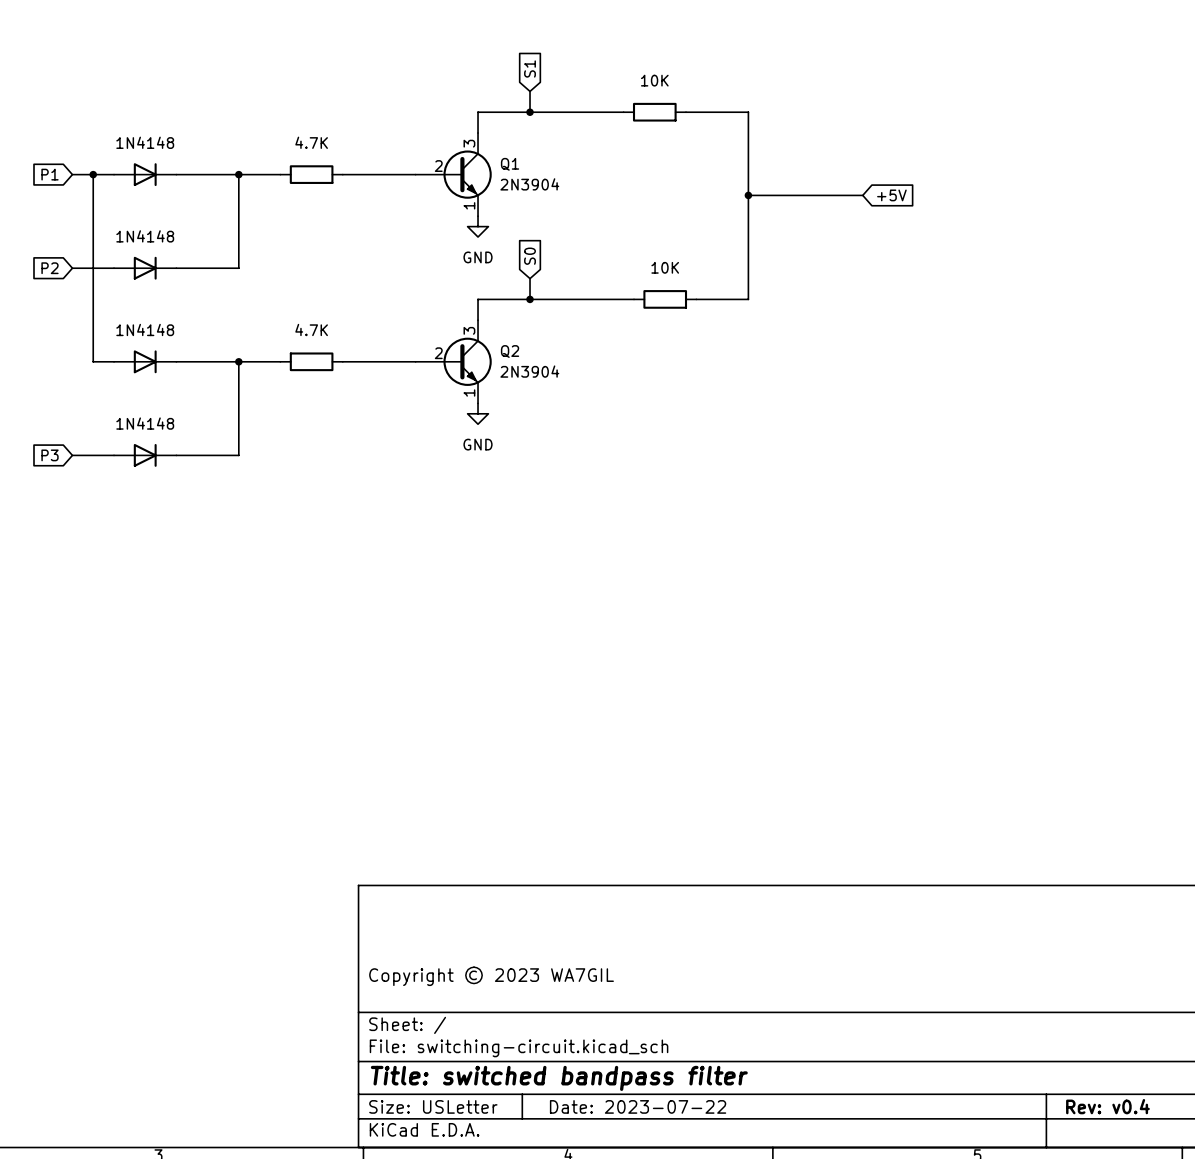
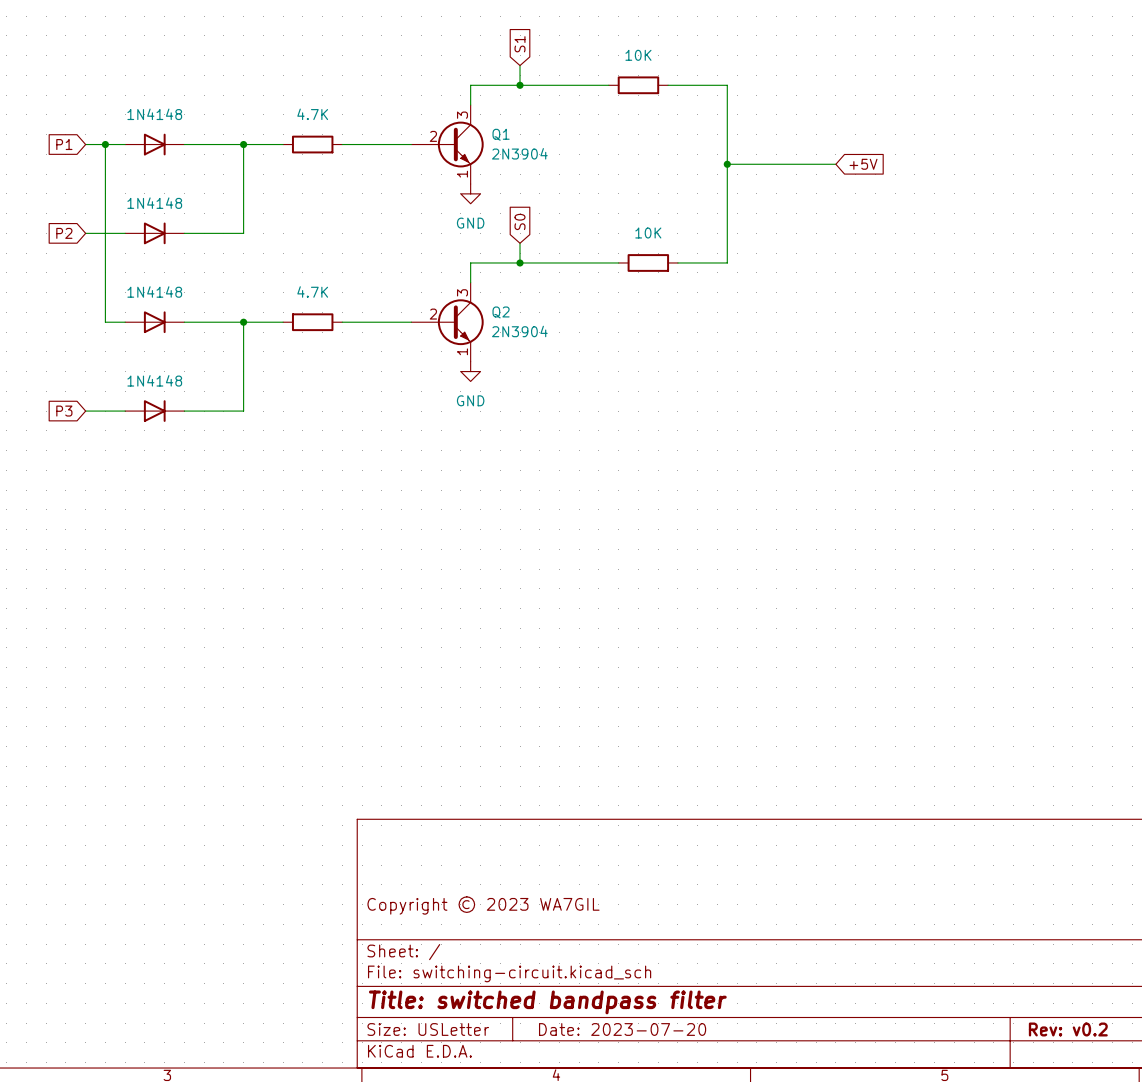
title block: Date: 2023-07-22 (638, 1106) -> Date: 2023-07-20 (622, 1029)
title block: Rev: v0.4 (1107, 1106) -> Rev: v0.2 (1068, 1029)

